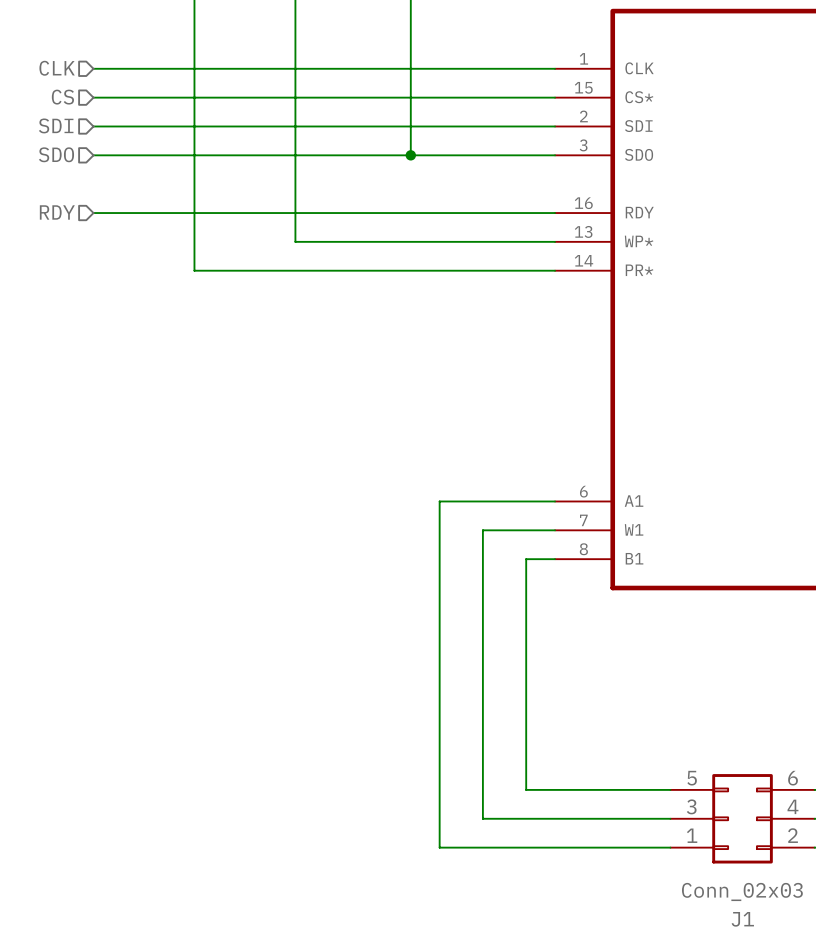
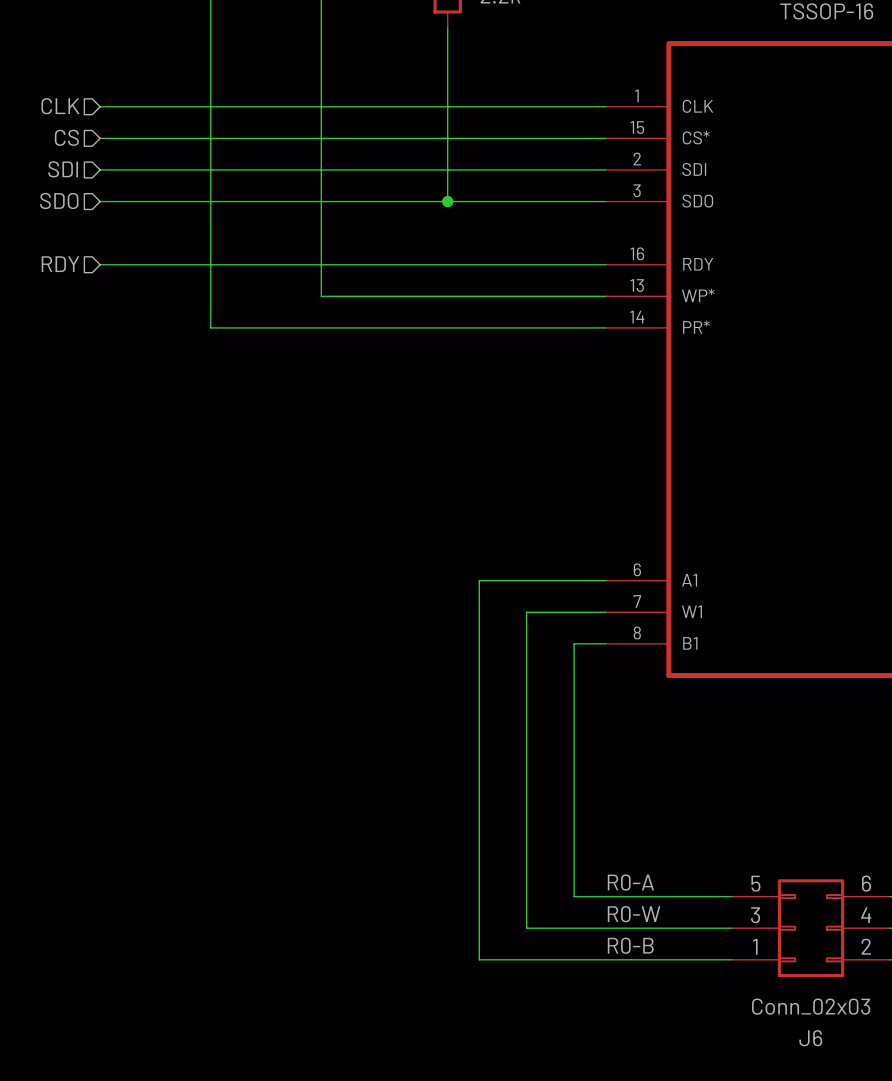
label: none -> R0-A (630, 882)
label: none -> R0-W (634, 914)
label: none -> R0-B (630, 945)
J1 name: J1 (742, 919) -> J6 (810, 1038)

